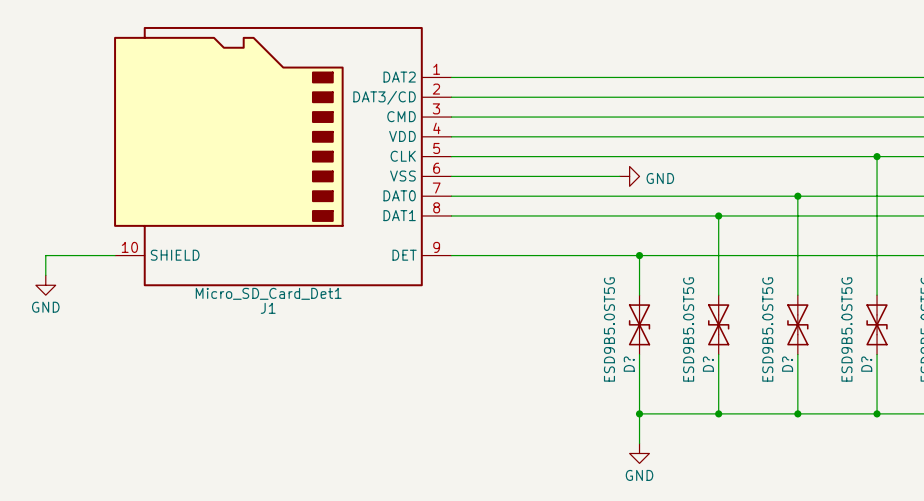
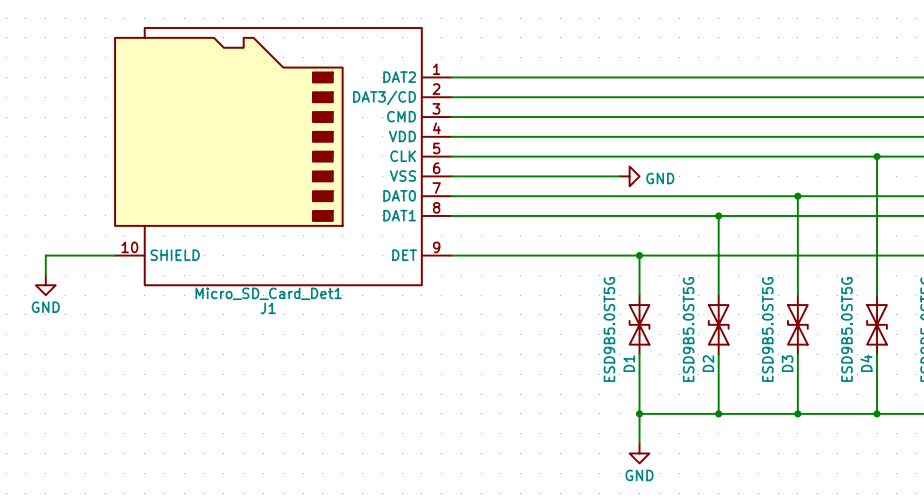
D? name: D? (629, 364) -> D1 (629, 363)
D? name: D? (708, 364) -> D2 (708, 363)
D? name: D? (787, 364) -> D3 (787, 363)
D? name: D? (866, 364) -> D4 (866, 363)

